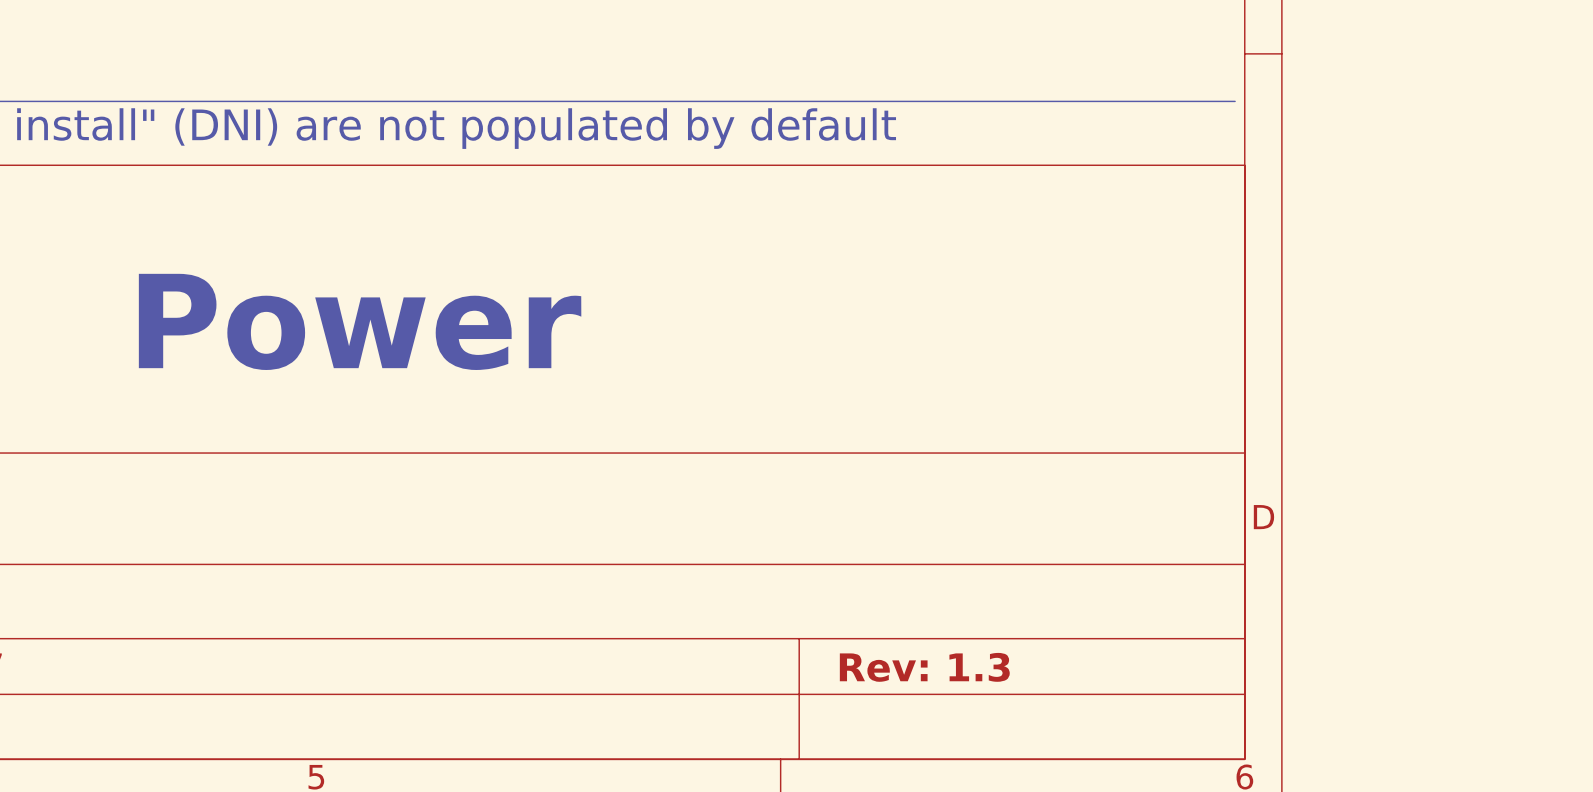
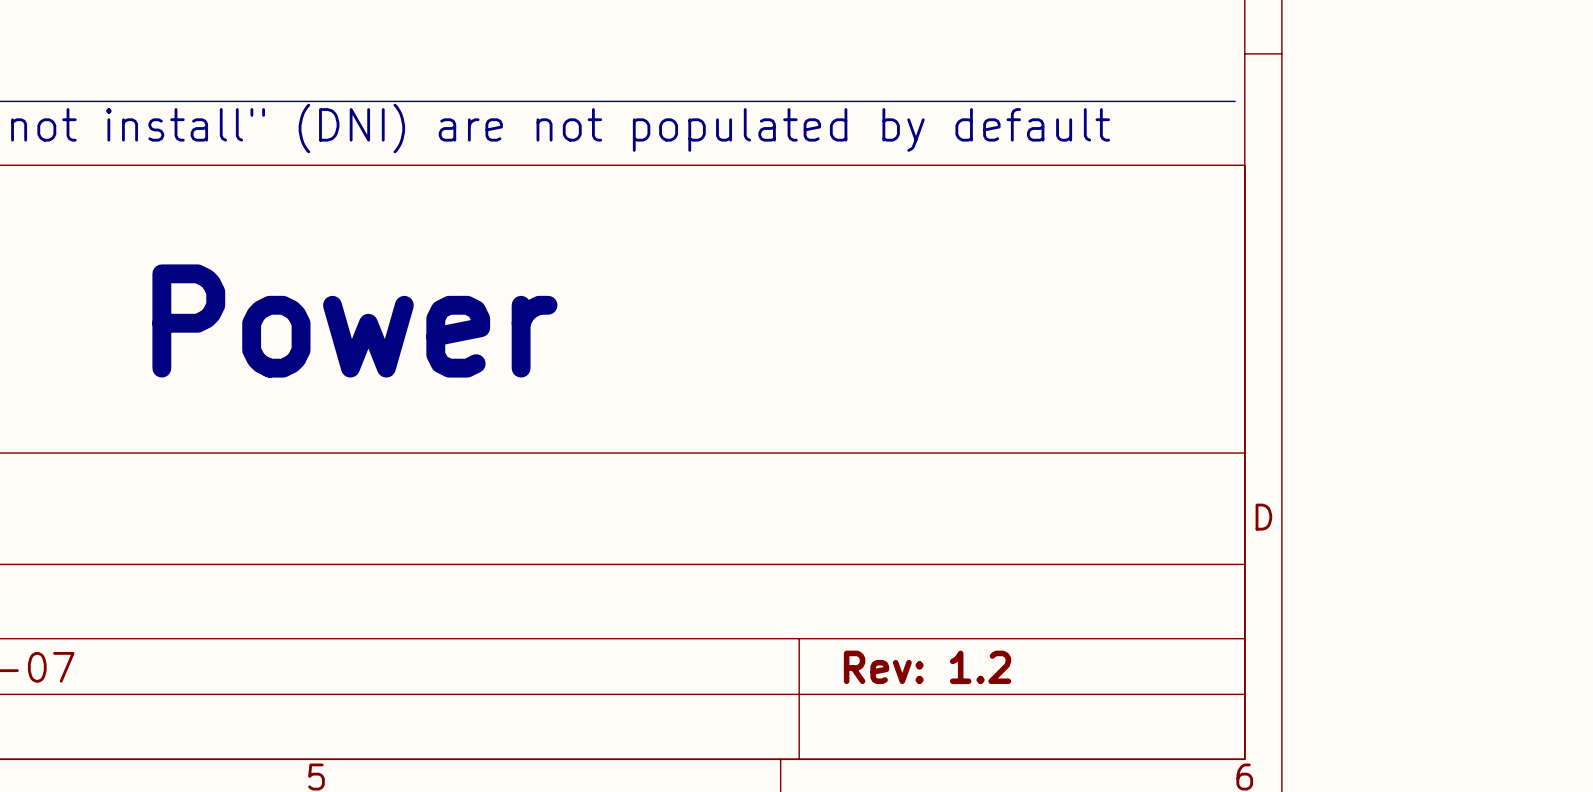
title block: Rev: 1.3 (924, 667) -> Rev: 1.2 (927, 667)

